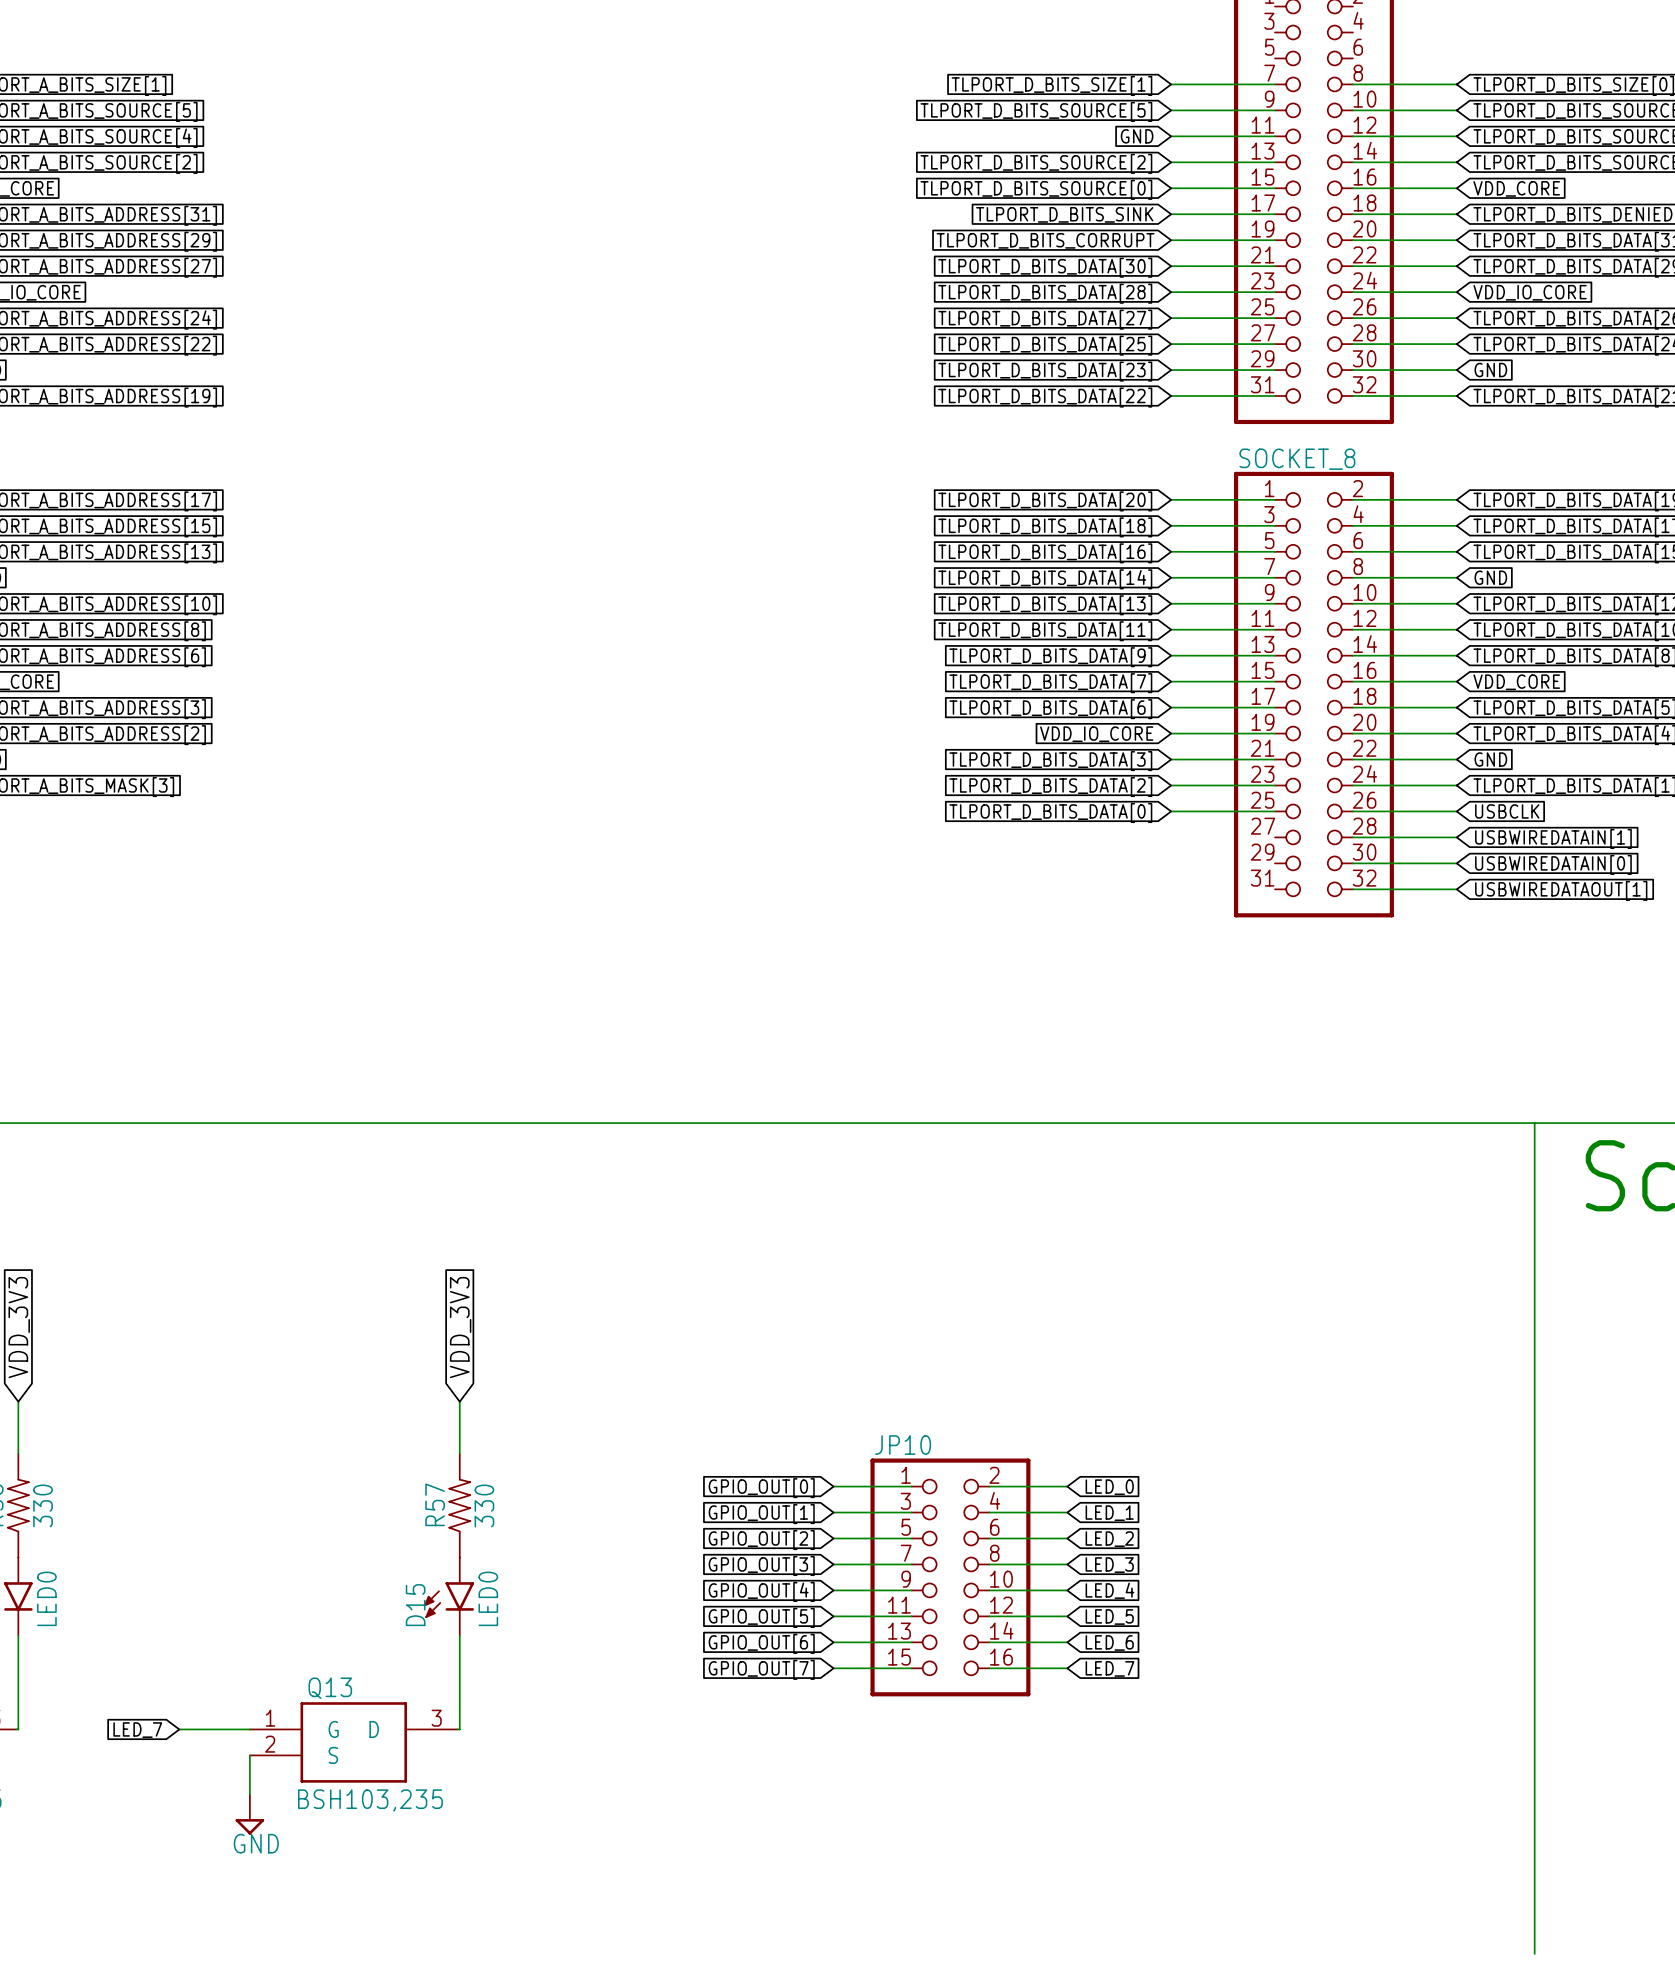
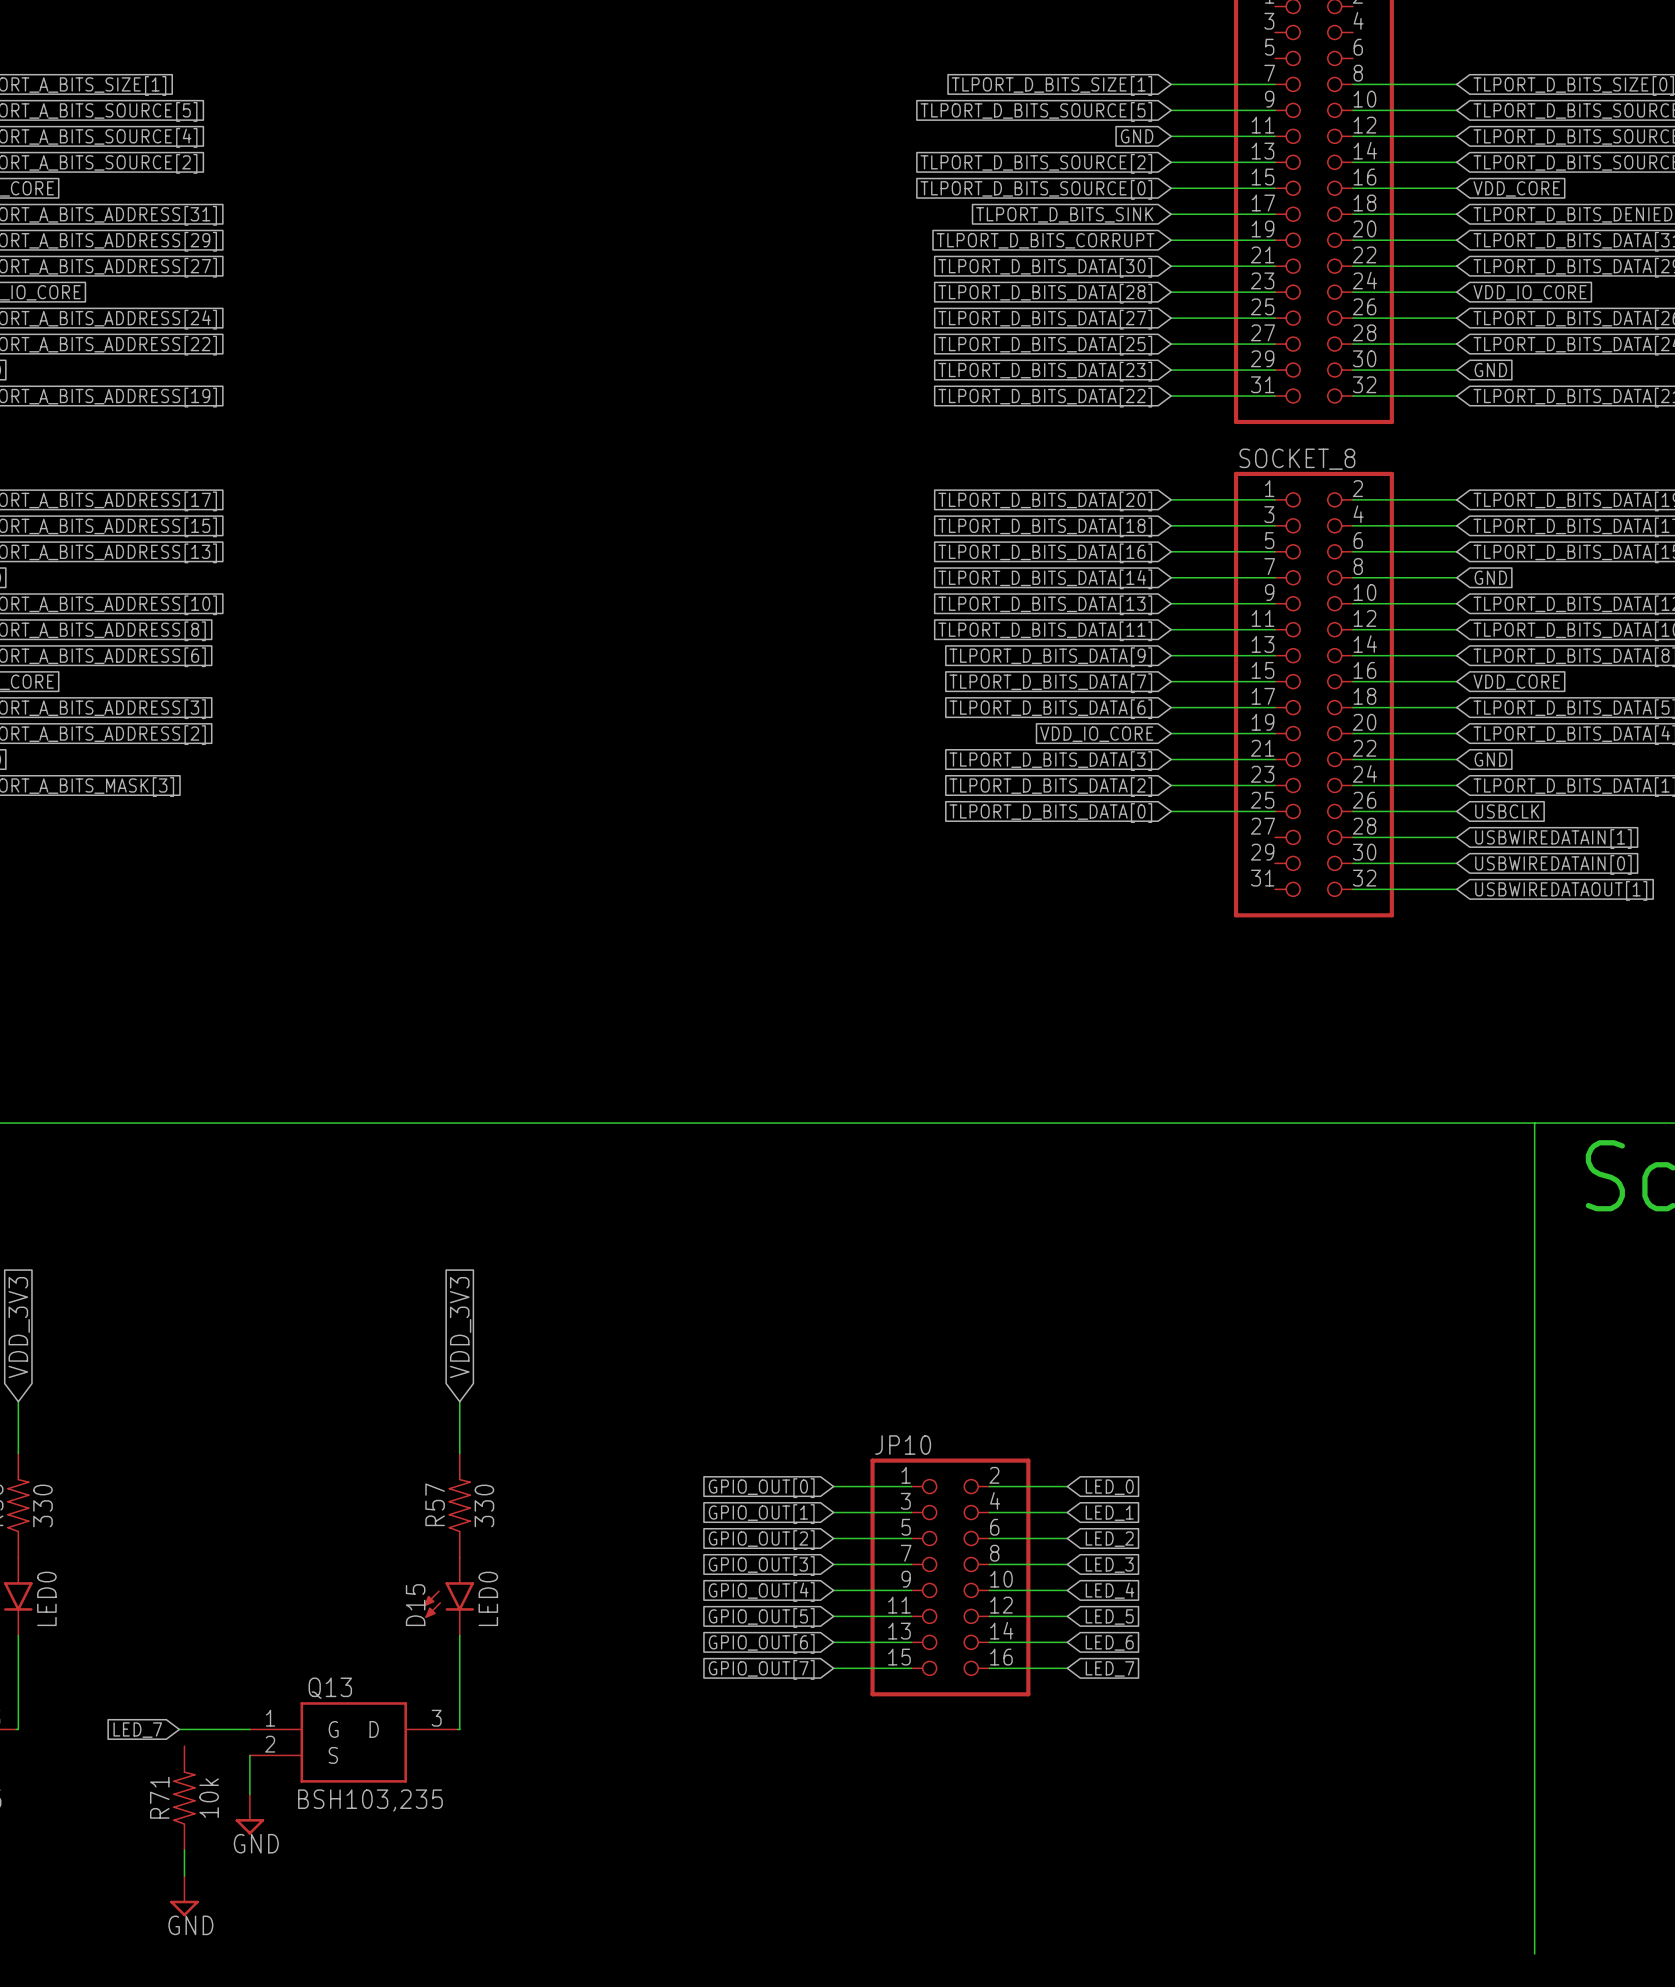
R71: none -> 10k (184, 1798)
wire: none -> (184, 1850) (184, 1876)
power symbol: none -> GND (184, 1896)

